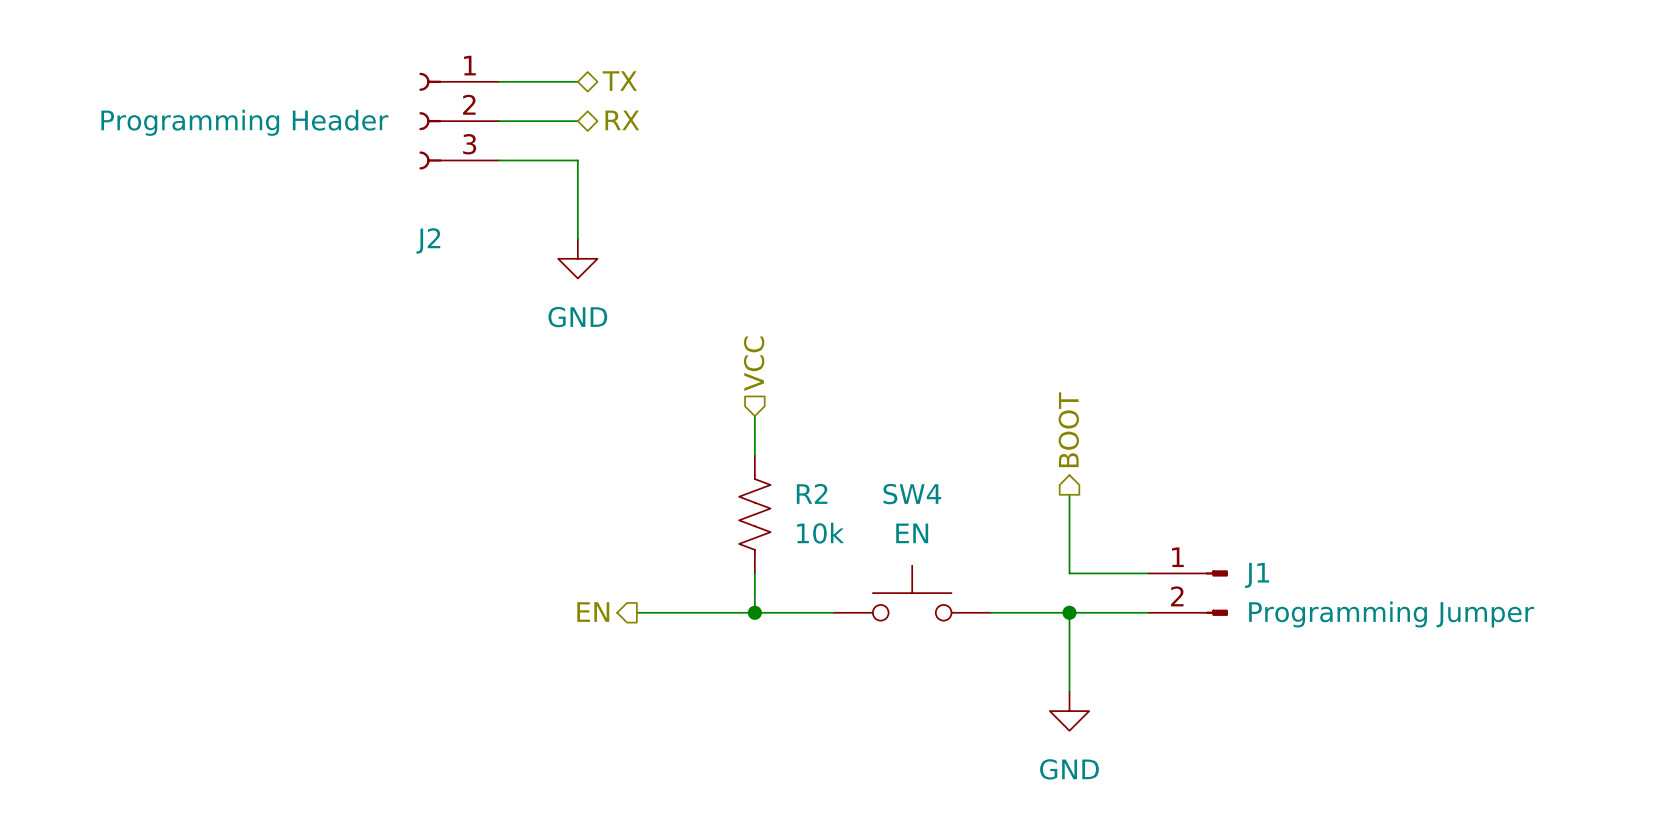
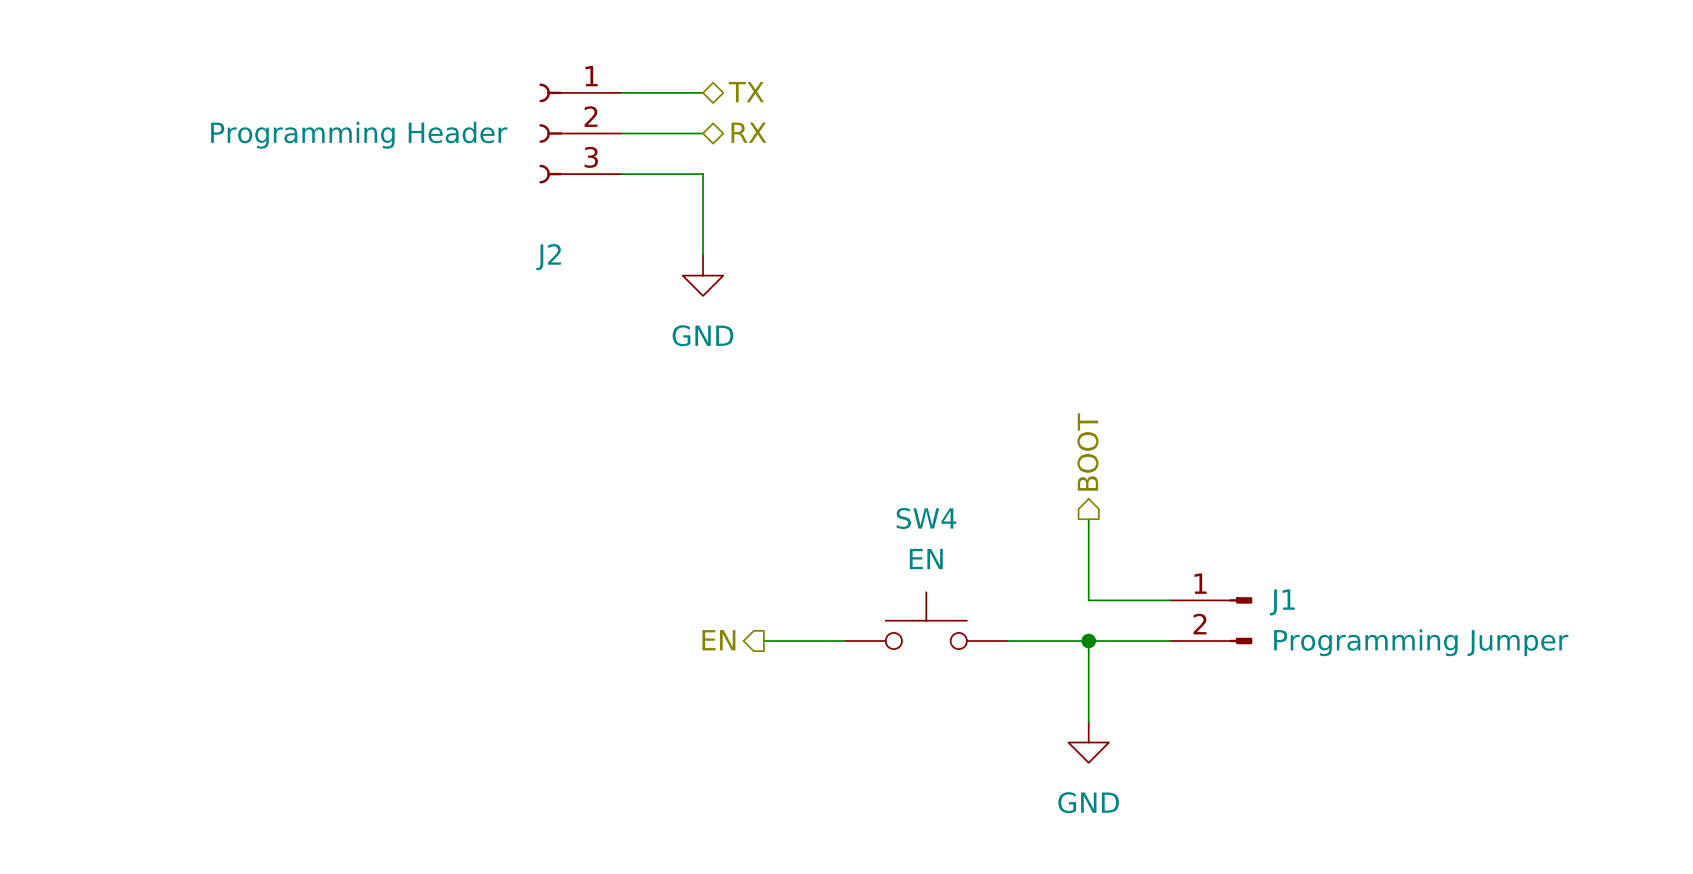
wire: (499, 81) (577, 81) -> (621, 92) (703, 92)
hierarchical label position: TX (619, 81) -> TX (746, 92)
hierarchical label position: RX (622, 120) -> RX (748, 132)
J2 position: (459, 121) -> (580, 133)
wire: (499, 121) (577, 121) -> (621, 133) (703, 133)
wire: (499, 160) (577, 160) (577, 239) -> (621, 174) (703, 174) (703, 255)
power symbol position: GND (577, 258) -> GND (703, 275)
hierarchical label: VCC (754, 363) -> none
wire: (754, 416) (754, 455) -> none
R2: 10k (754, 514) -> none
wire: (754, 573) (754, 612) (636, 612) -> none
hierarchical label position: EN (593, 612) -> EN (718, 640)
junction: (754, 612) -> none

